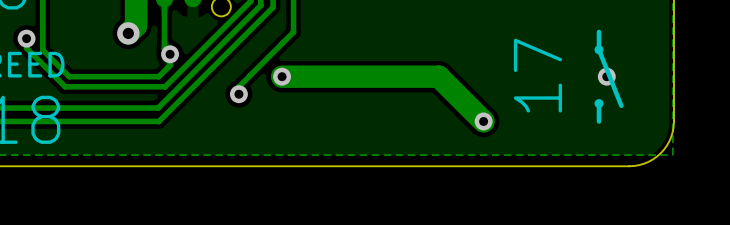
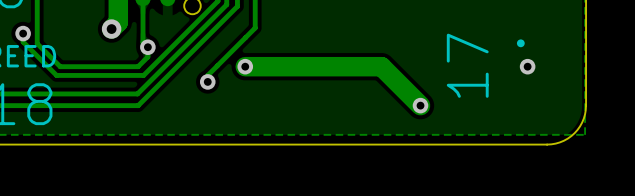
line: (598, 31) (598, 49) (621, 105) -> none
drawing: [594, 99, 604, 109] -> none
line: (598, 103) (598, 121) -> none

